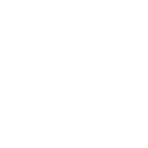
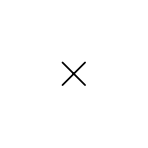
no-connect mark: none -> (73, 73)

